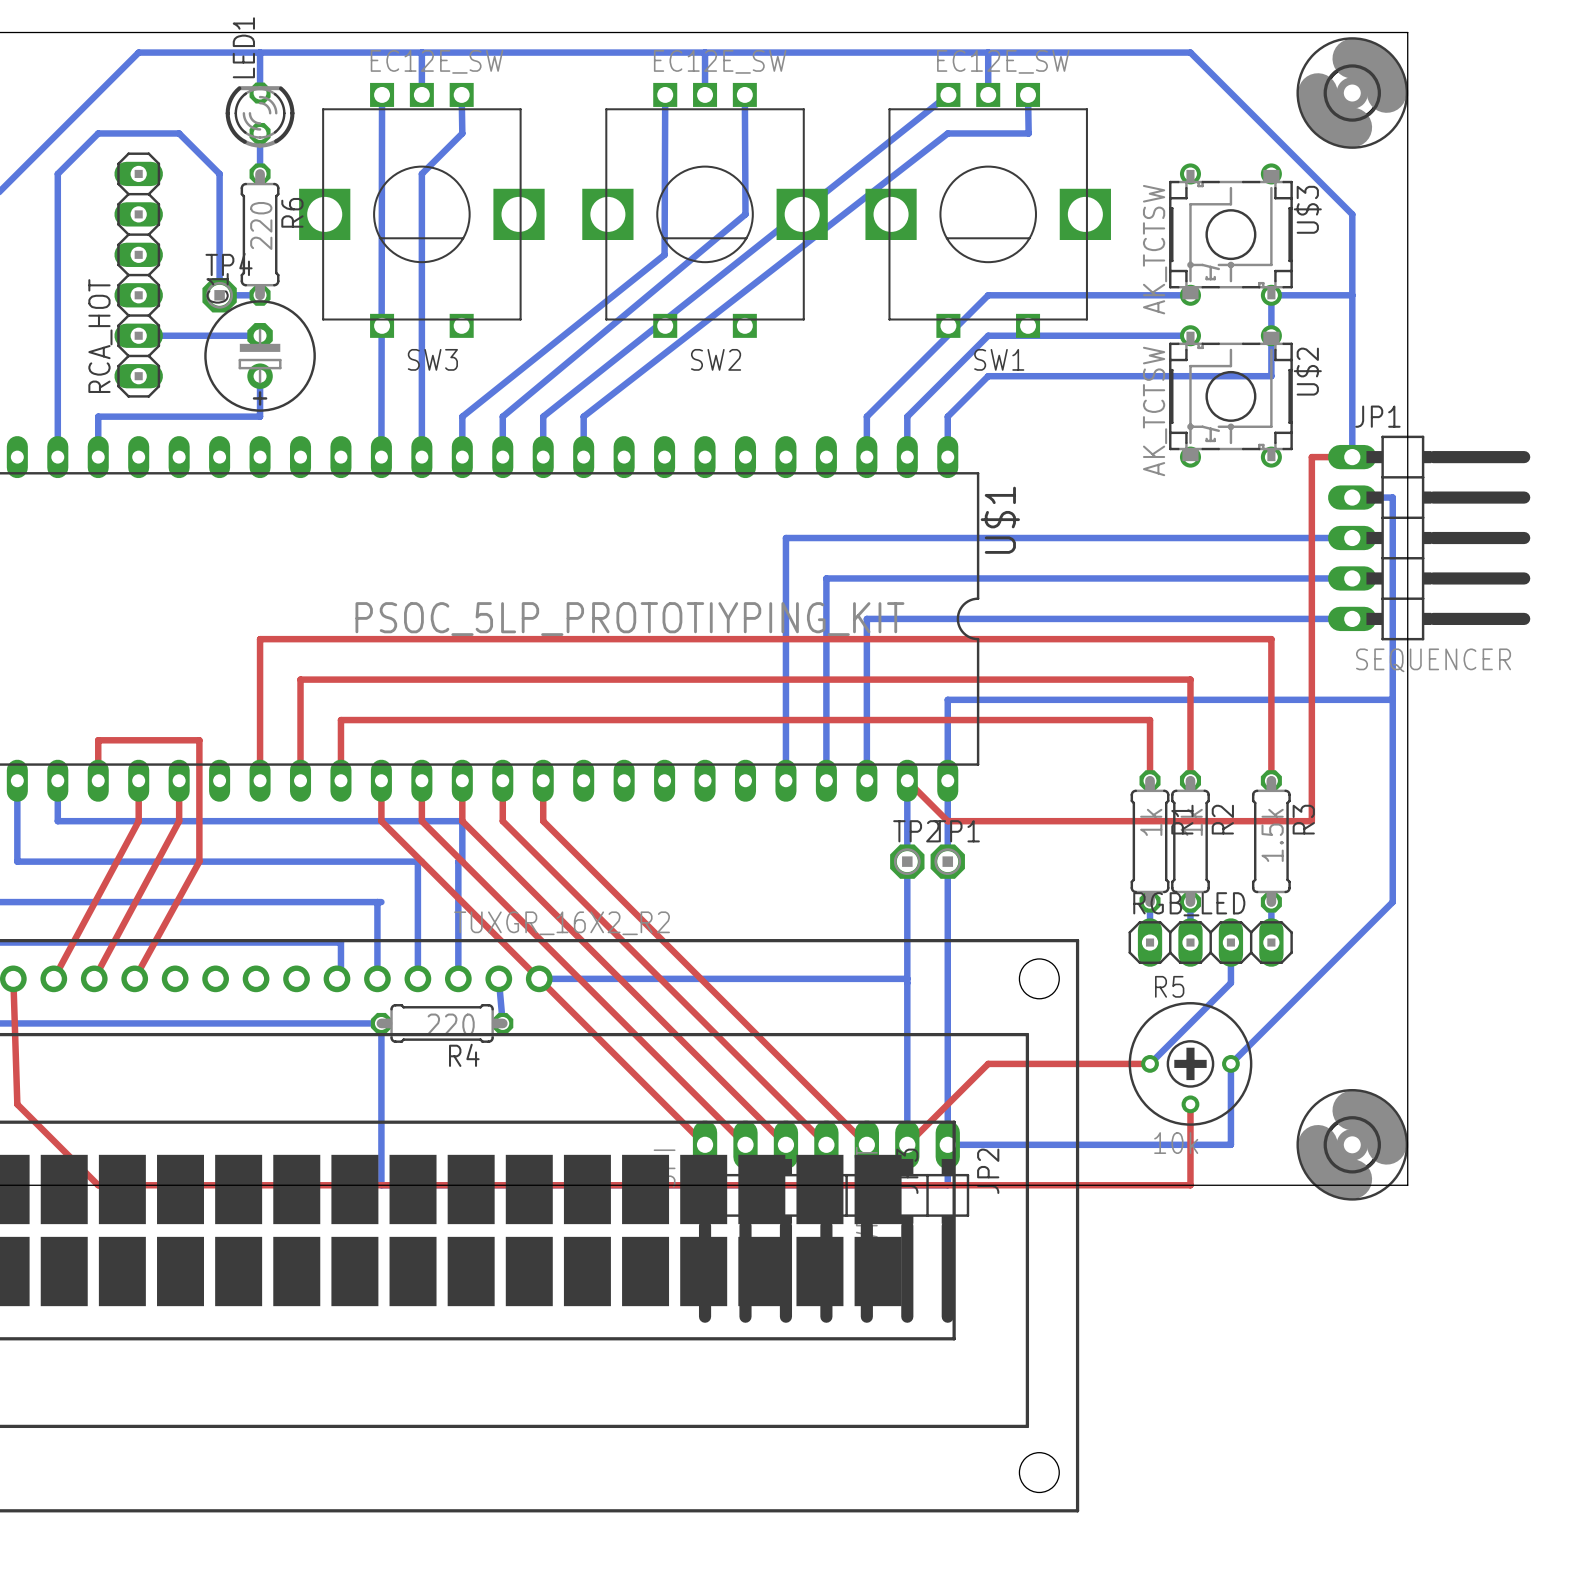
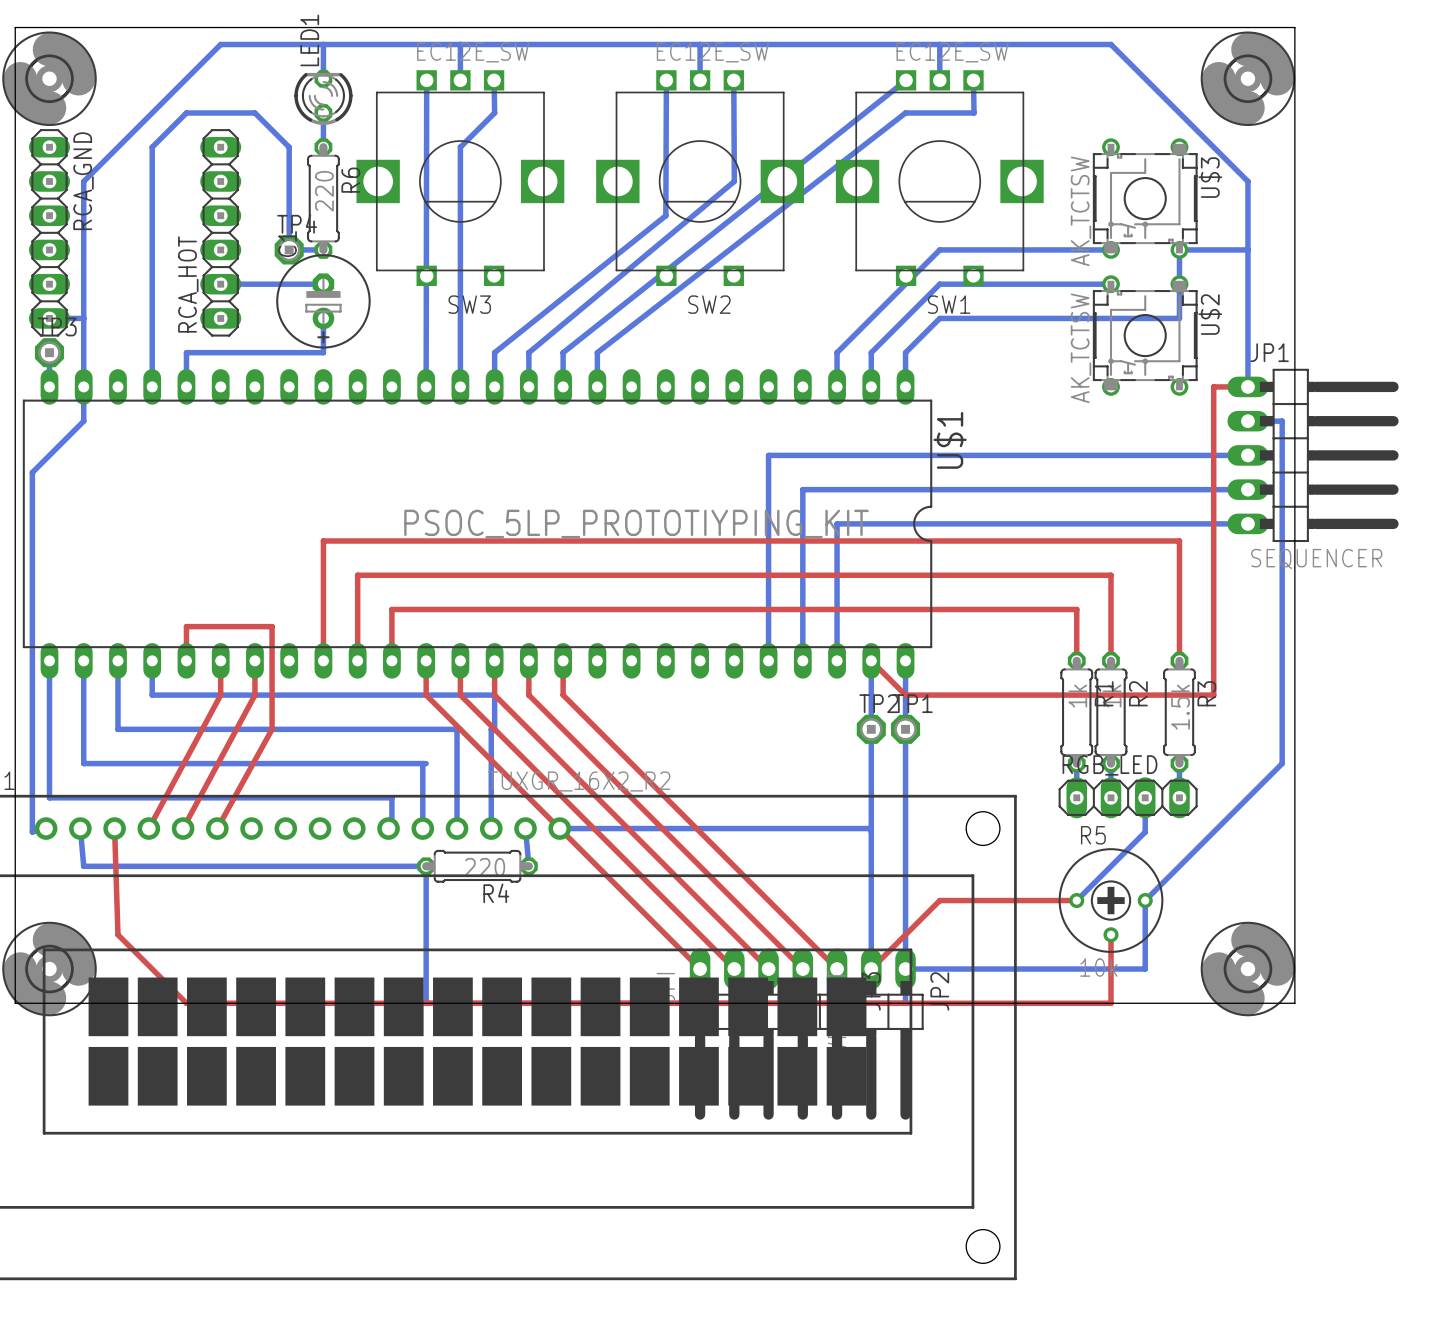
bottom track: (1392, 699) (947, 699) (947, 780) -> none

